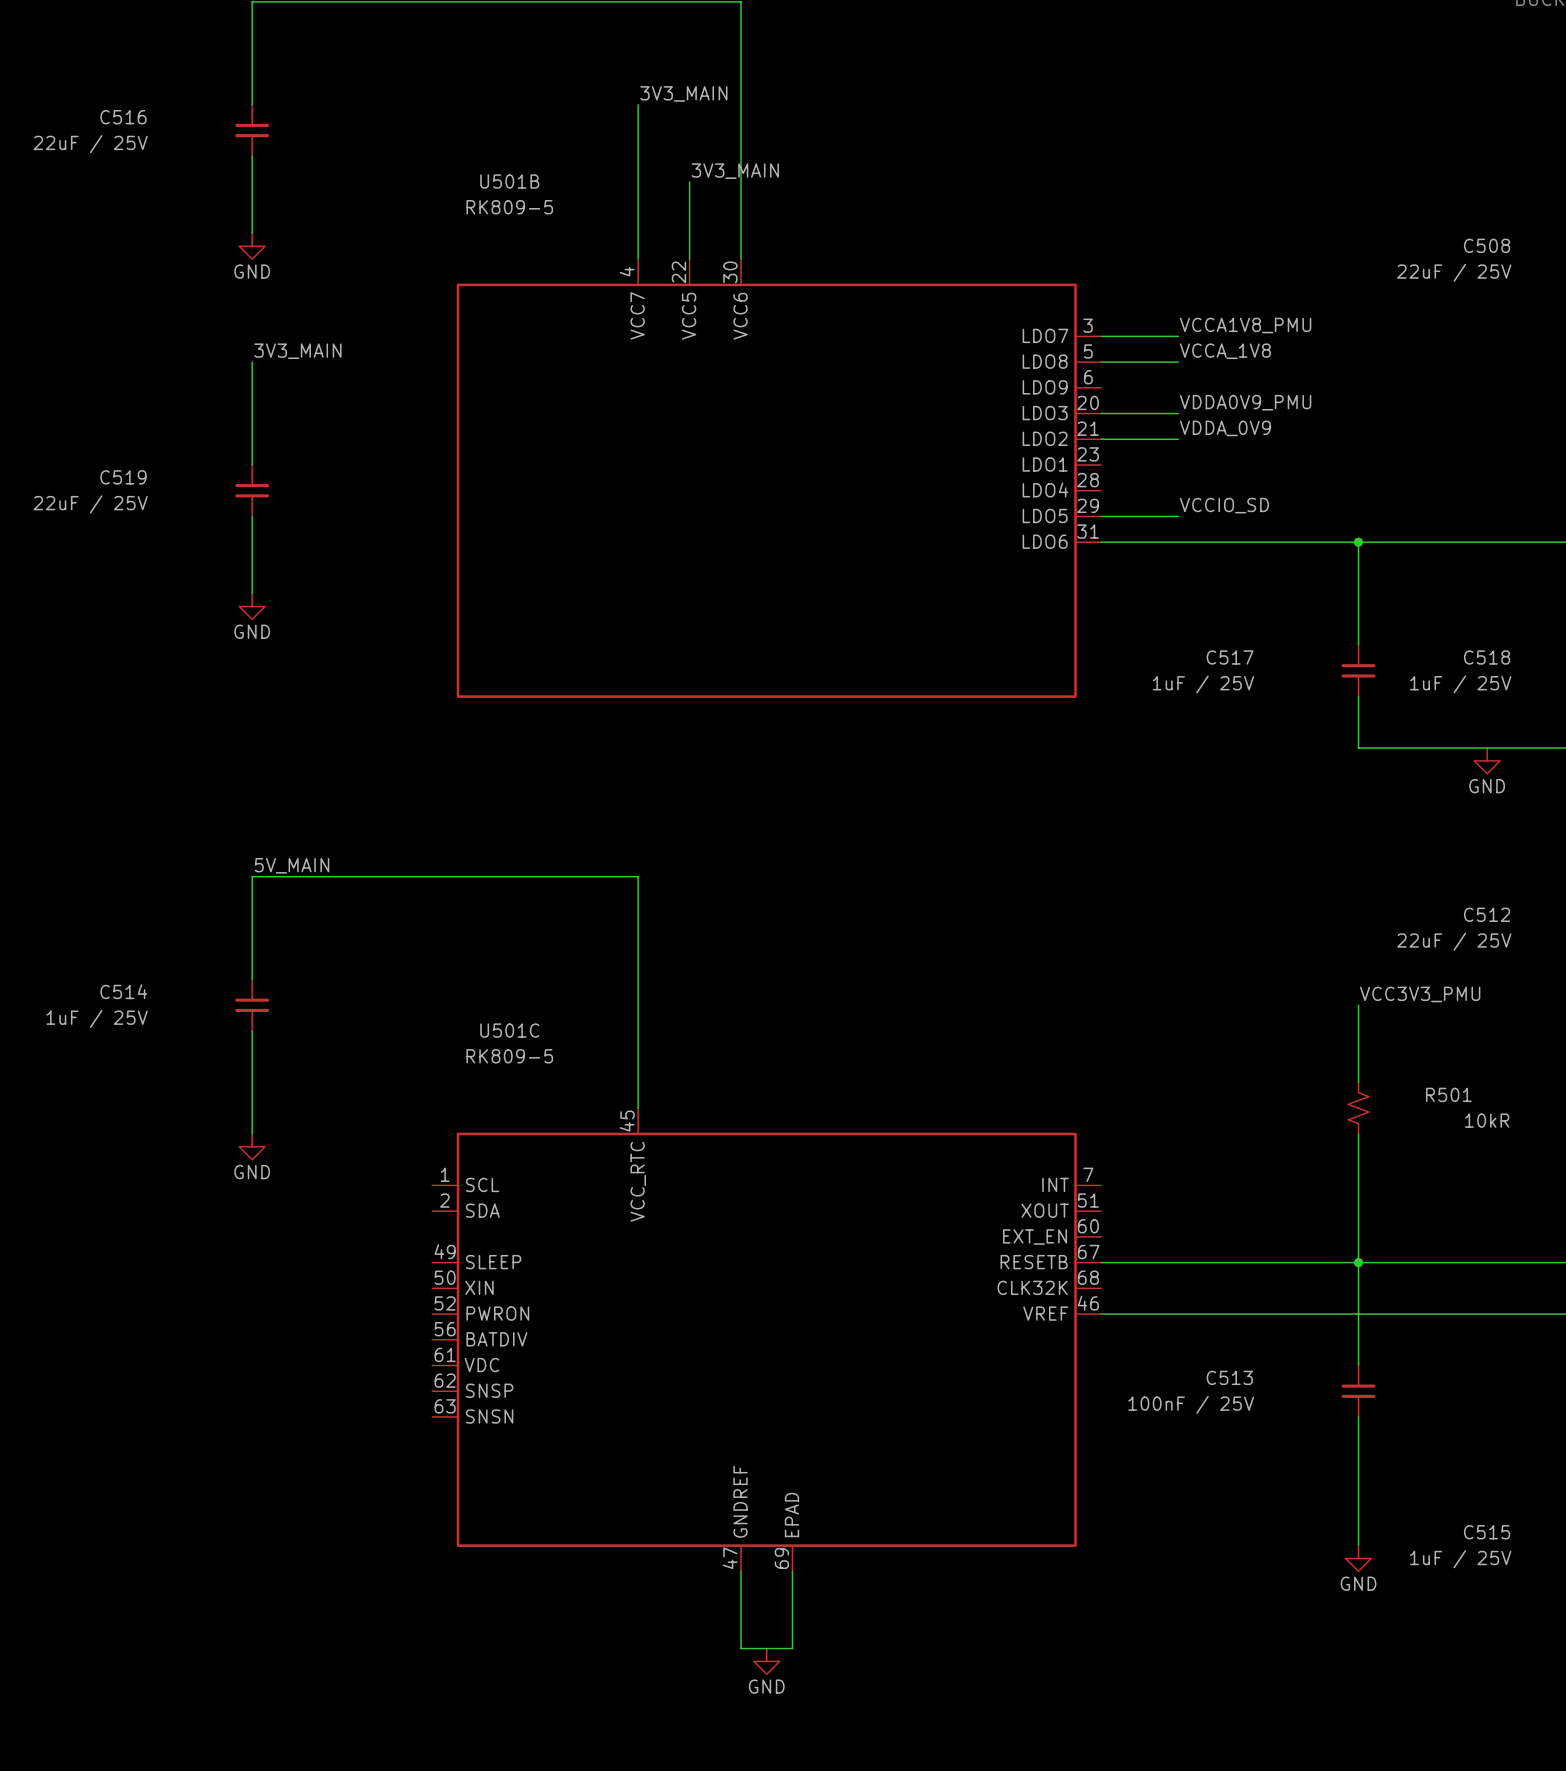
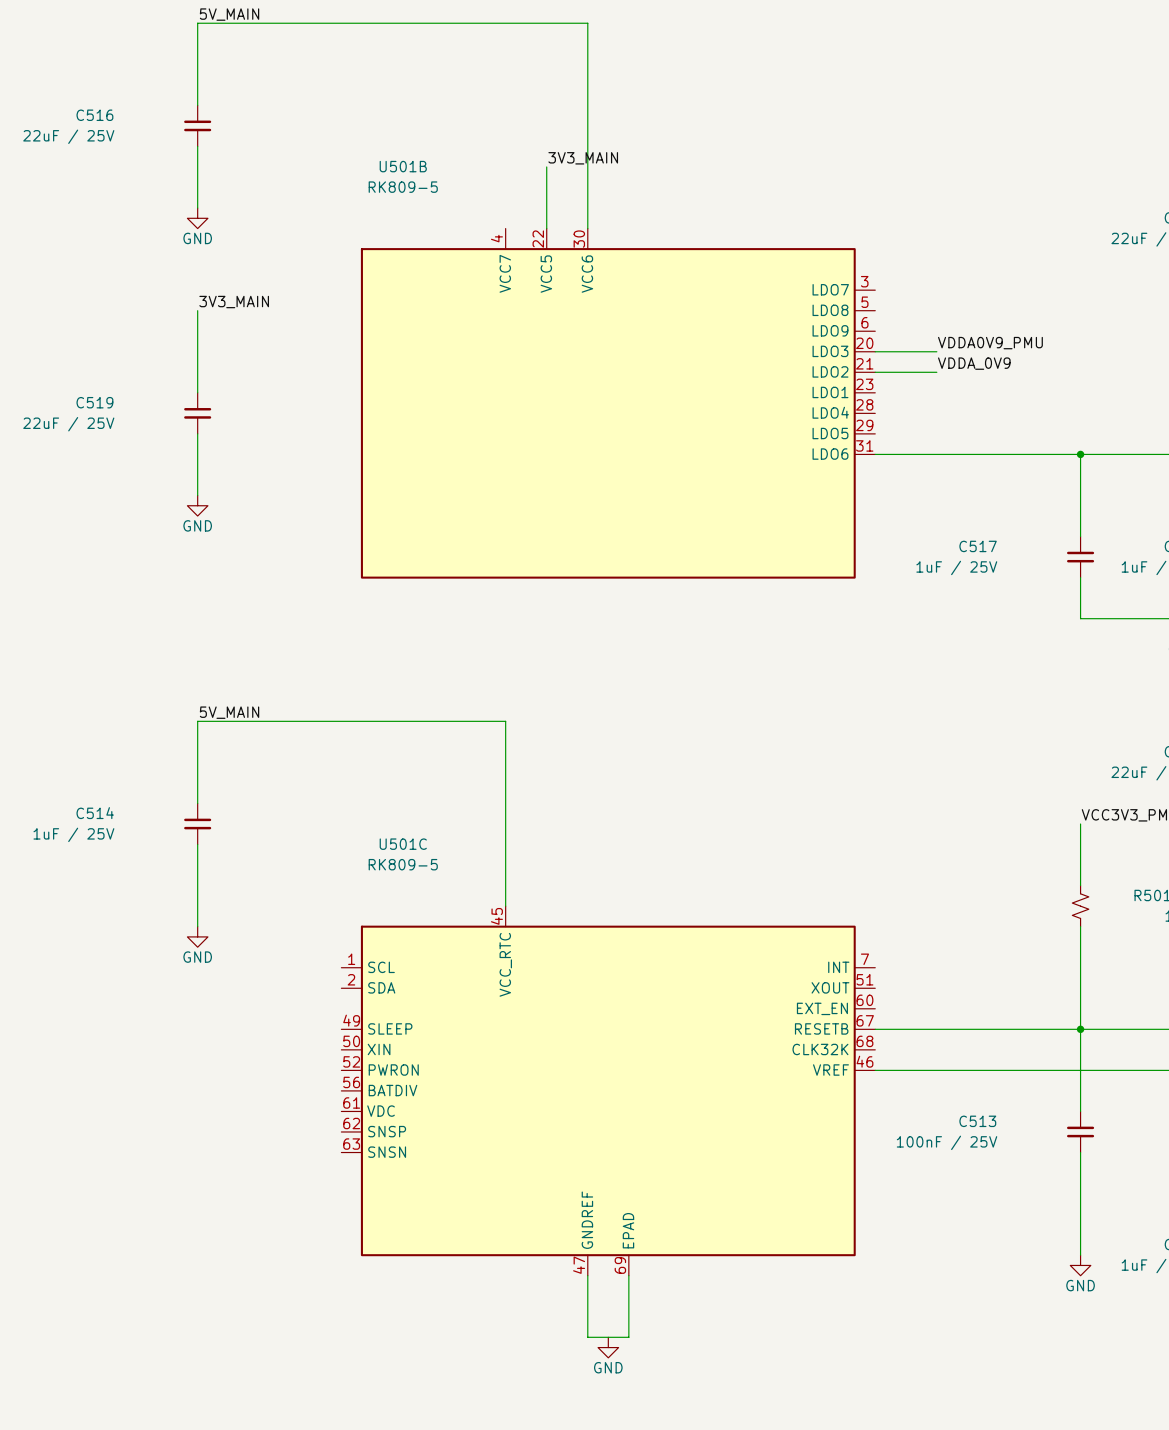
label: 3V3_MAIN (683, 93) -> none
wire: (638, 104) (638, 259) -> none
label: VCCA1V8_PMU (1245, 325) -> none
wire: (1101, 336) (1178, 336) -> none
label: VCCA_1V8 (1225, 351) -> none
wire: (1101, 362) (1178, 362) -> none
label: VCCIO_SD (1224, 505) -> none
wire: (1101, 516) (1178, 516) -> none

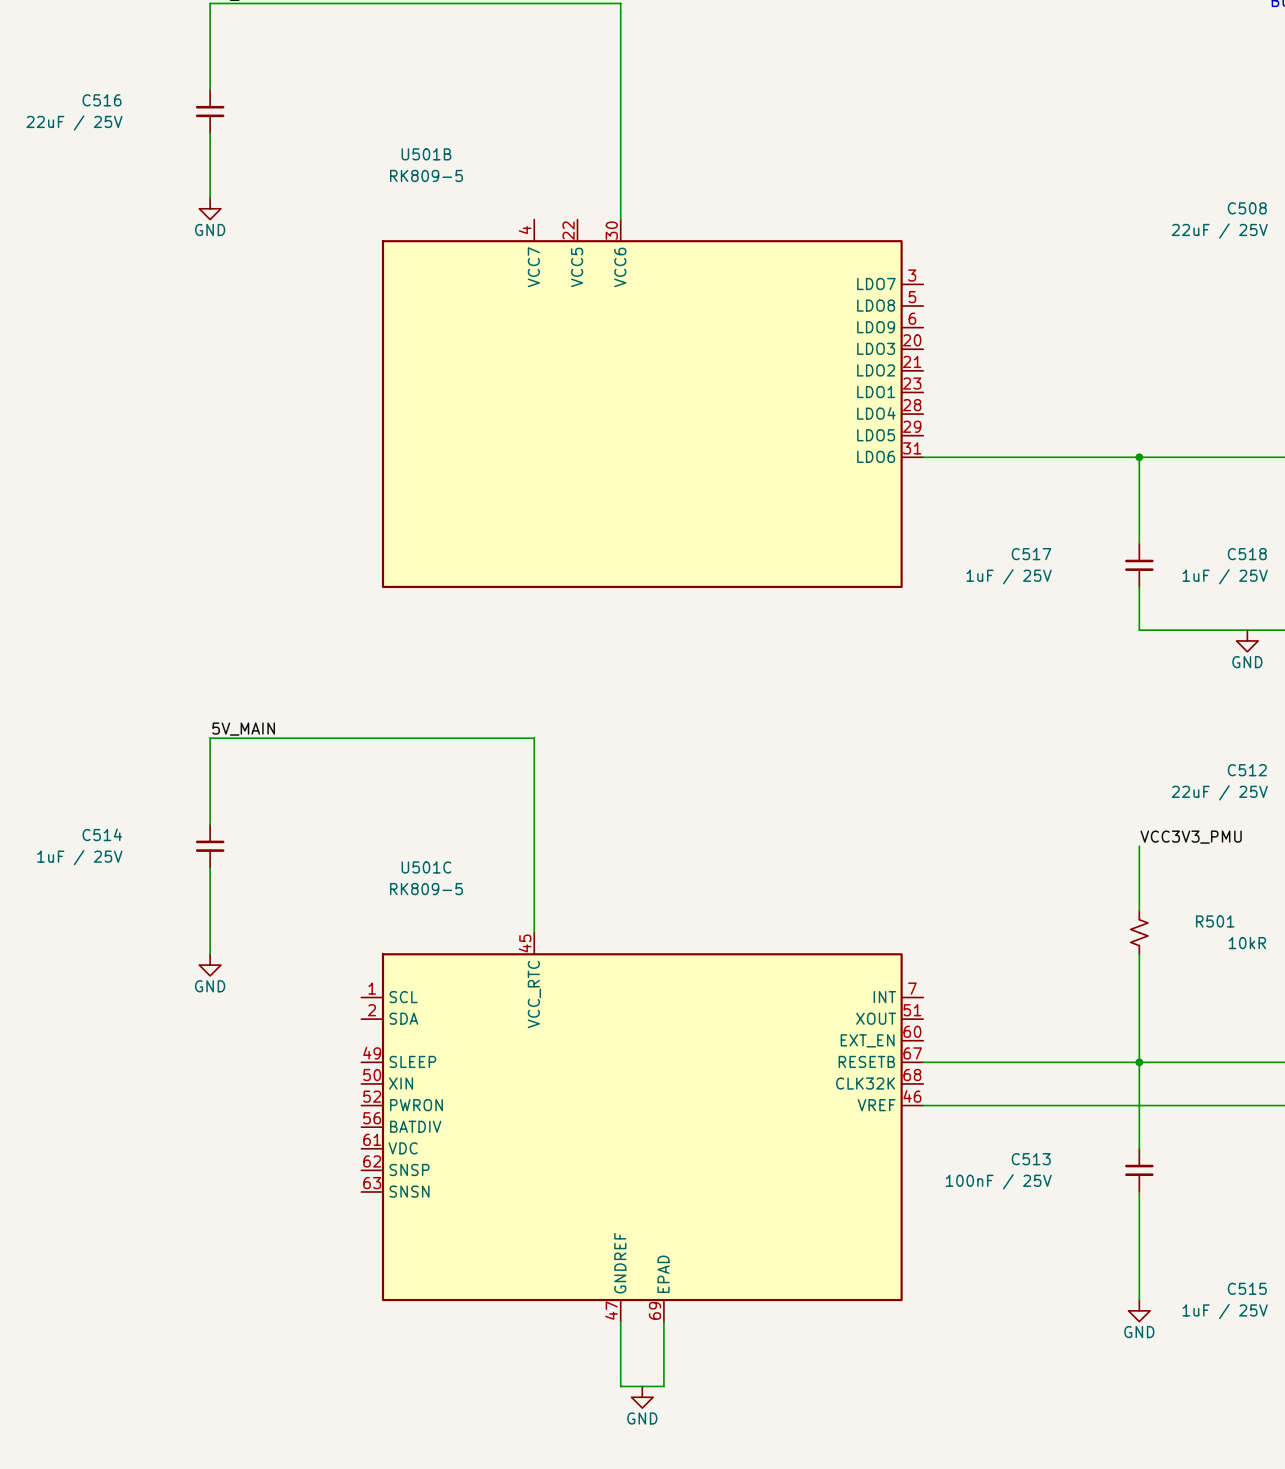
label: 3V3_MAIN (583, 158) -> none
wire: (546, 166) (546, 228) -> none
label: 3V3_MAIN (234, 302) -> none
wire: (197, 310) (197, 392) -> none
label: VDDA0V9_PMU (990, 343) -> none
wire: (875, 351) (936, 351) -> none
label: VDDA_0V9 (974, 363) -> none
wire: (875, 372) (936, 372) -> none
C519: 22uF / 25V (197, 413) -> none
wire: (197, 433) (197, 495) -> none
power symbol: GND (197, 505) -> none

